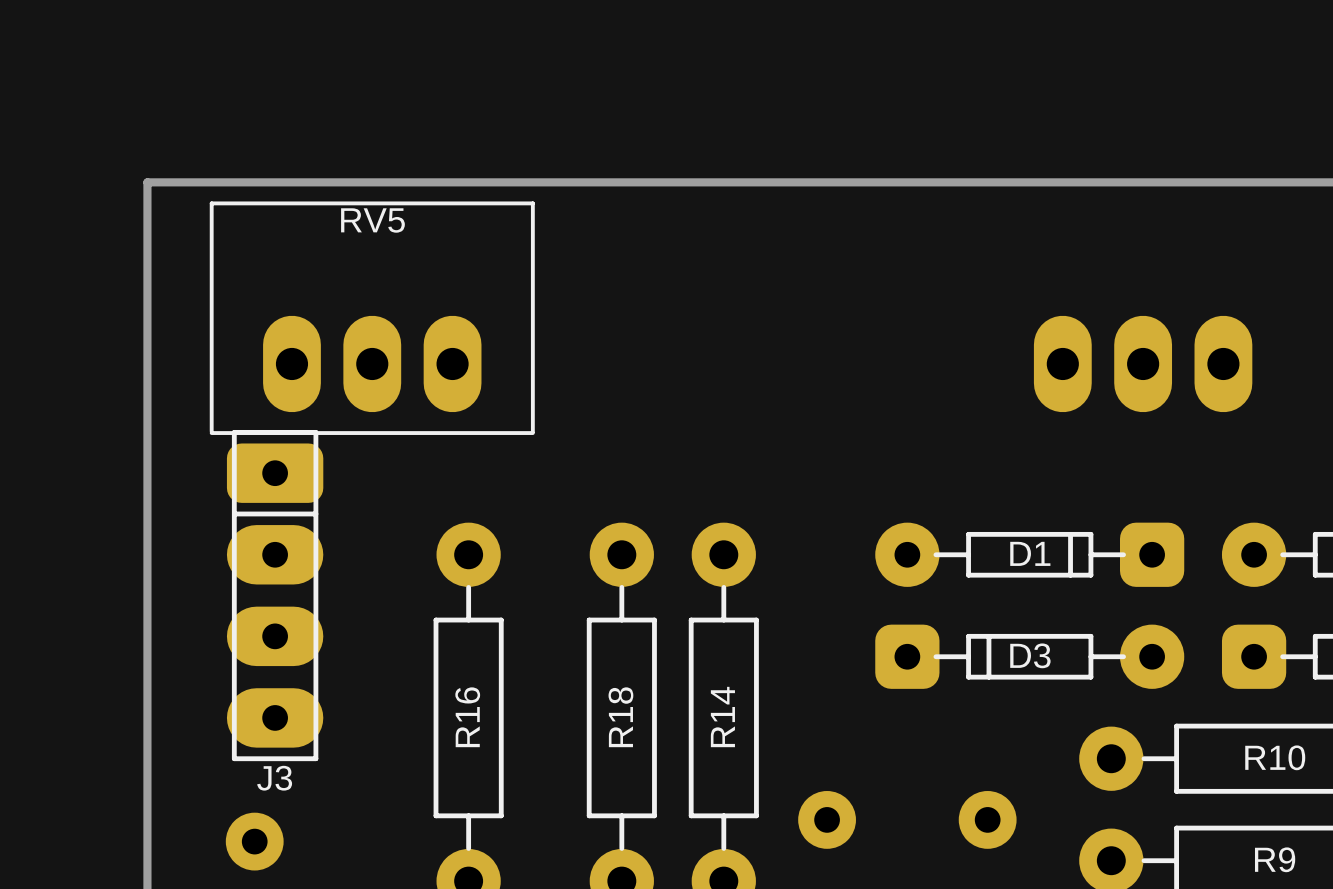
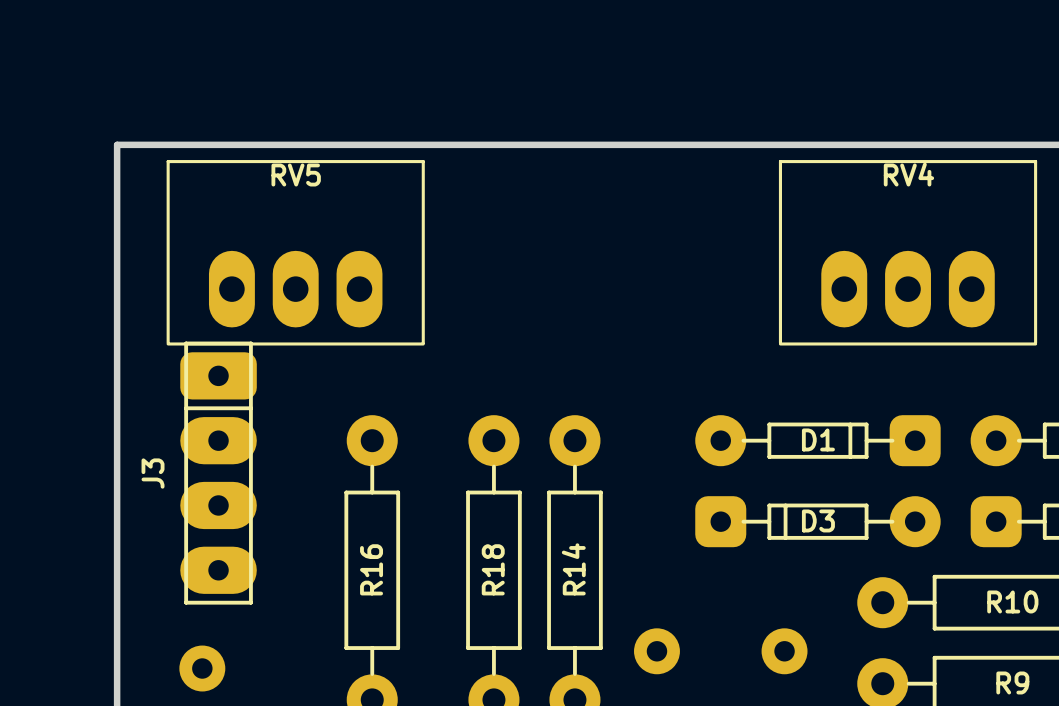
RV4 side: bottom (1143, 363) -> top (908, 252)
J3 name rotation: 0° (274, 778) -> 90° counterclockwise (153, 473)
J3 name position: J3 (274, 778) -> J3 (153, 473)

